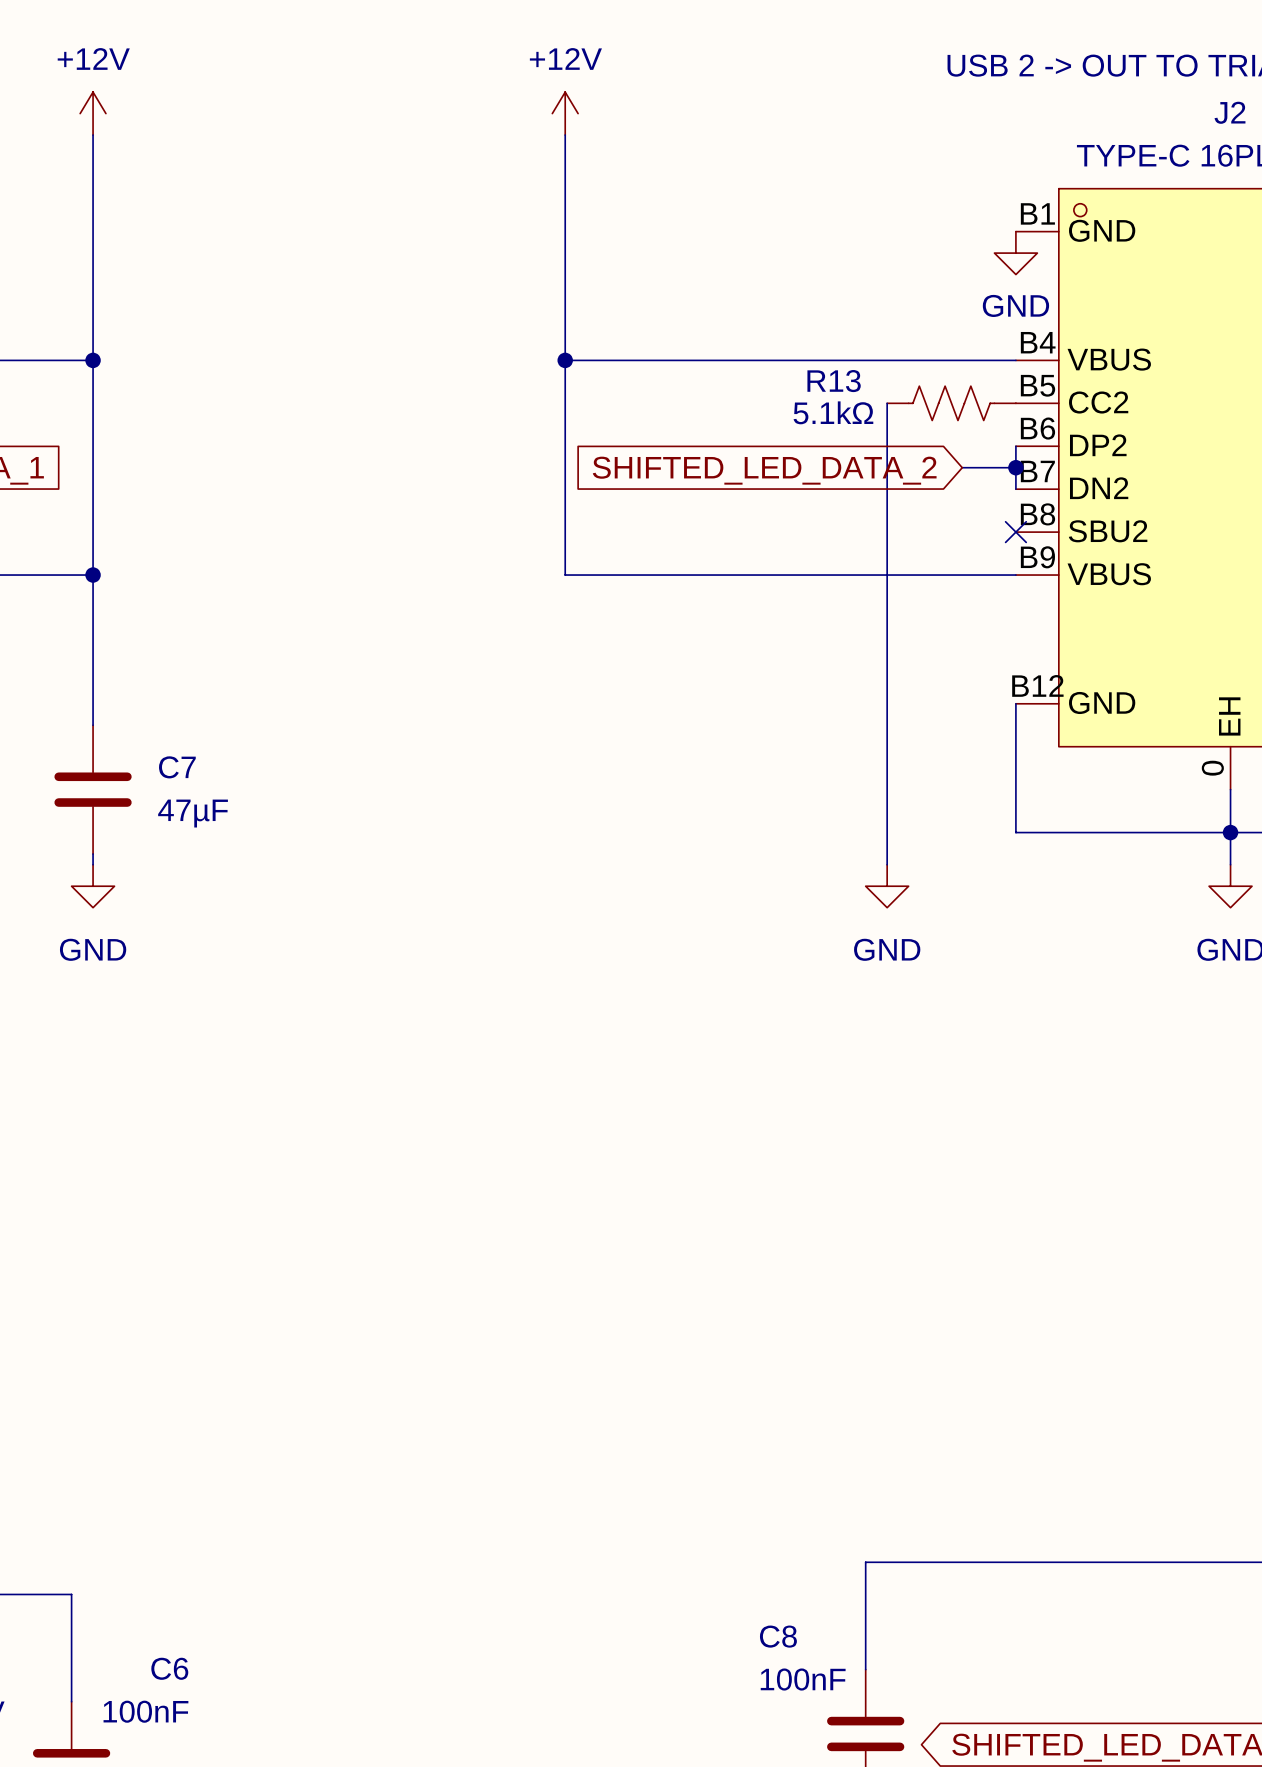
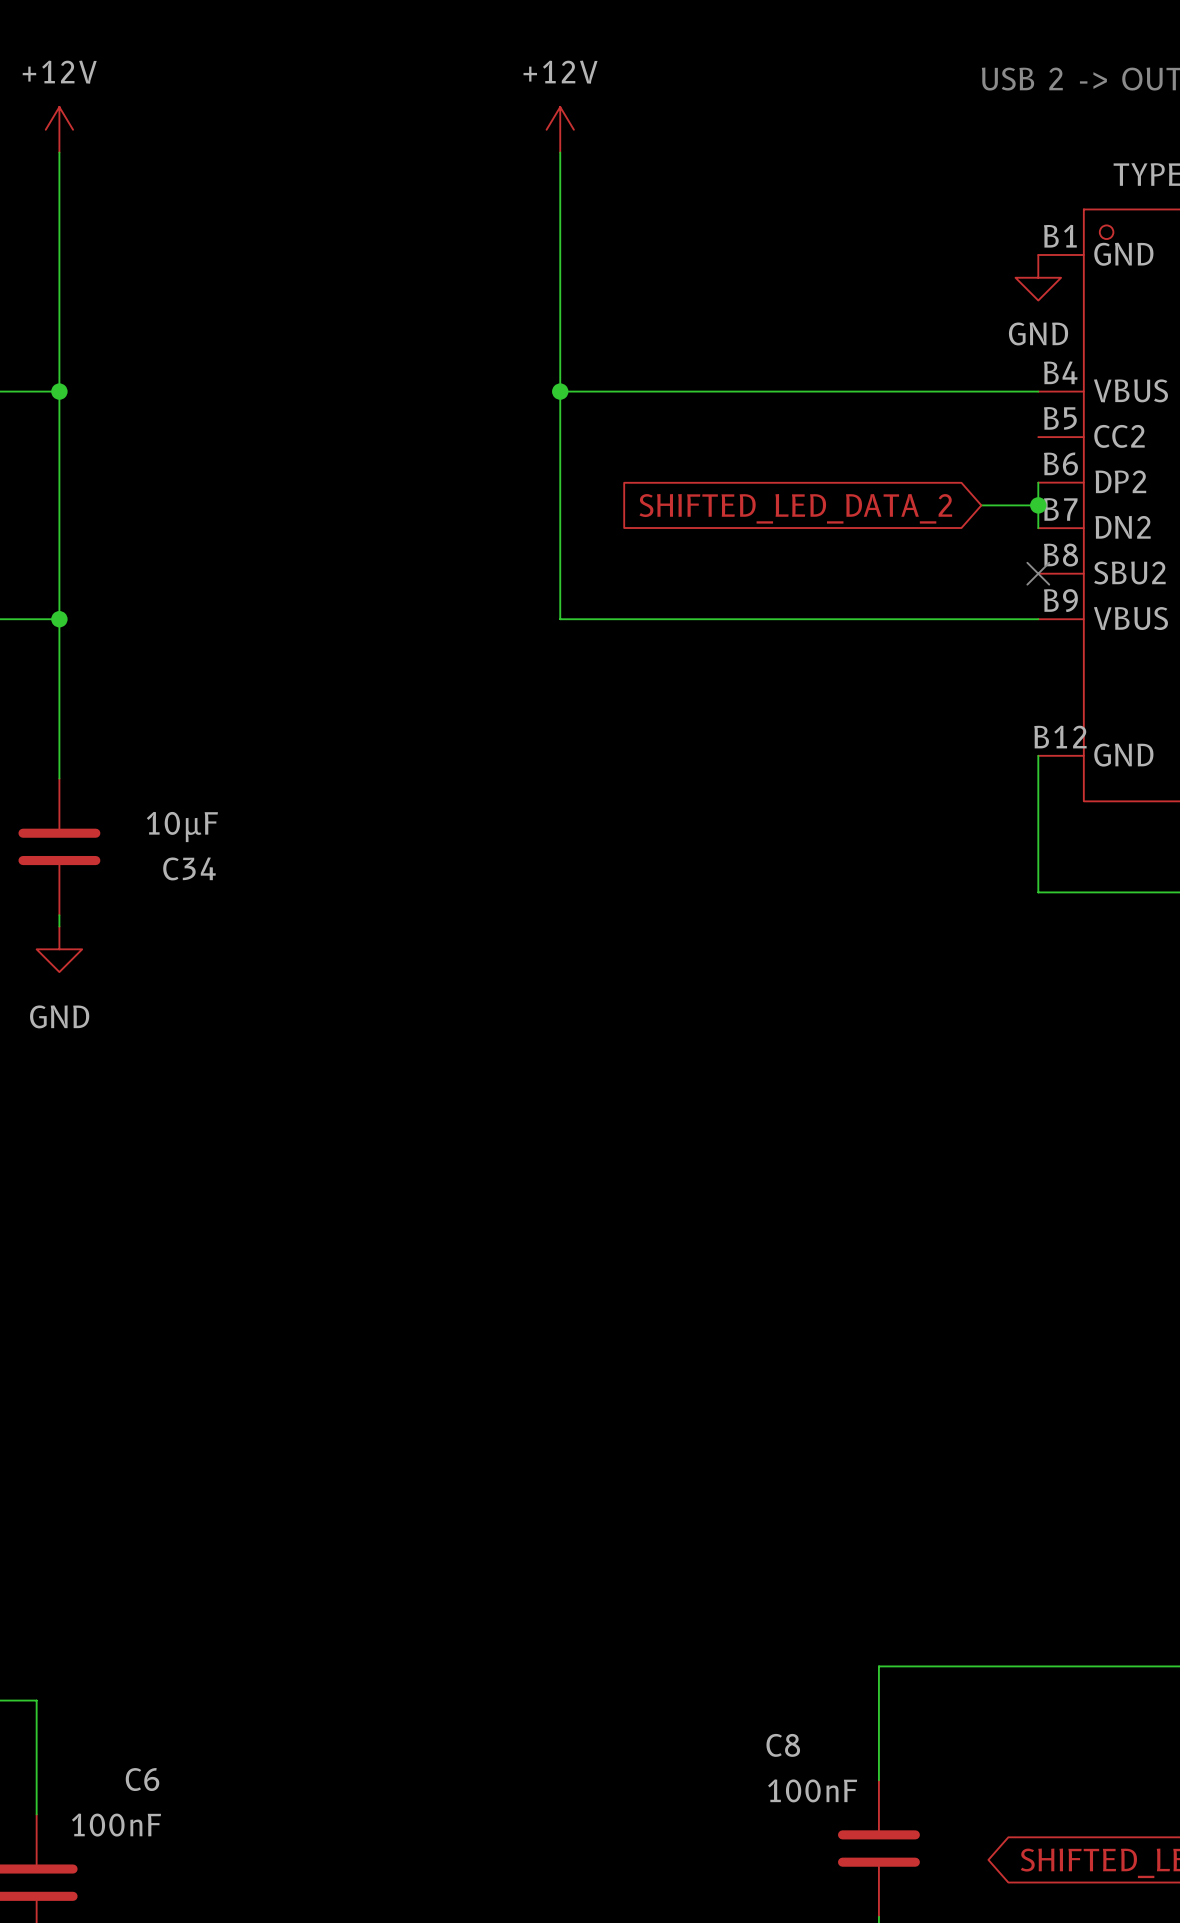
wire: (887, 403) (887, 864) -> none
R13: 5.1kΩ (951, 403) -> none
C7 name: C7 (177, 767) -> C34 (189, 868)
C7 value: 47µF (193, 813) -> 10µF (182, 827)
power symbol: GND (887, 886) -> none

